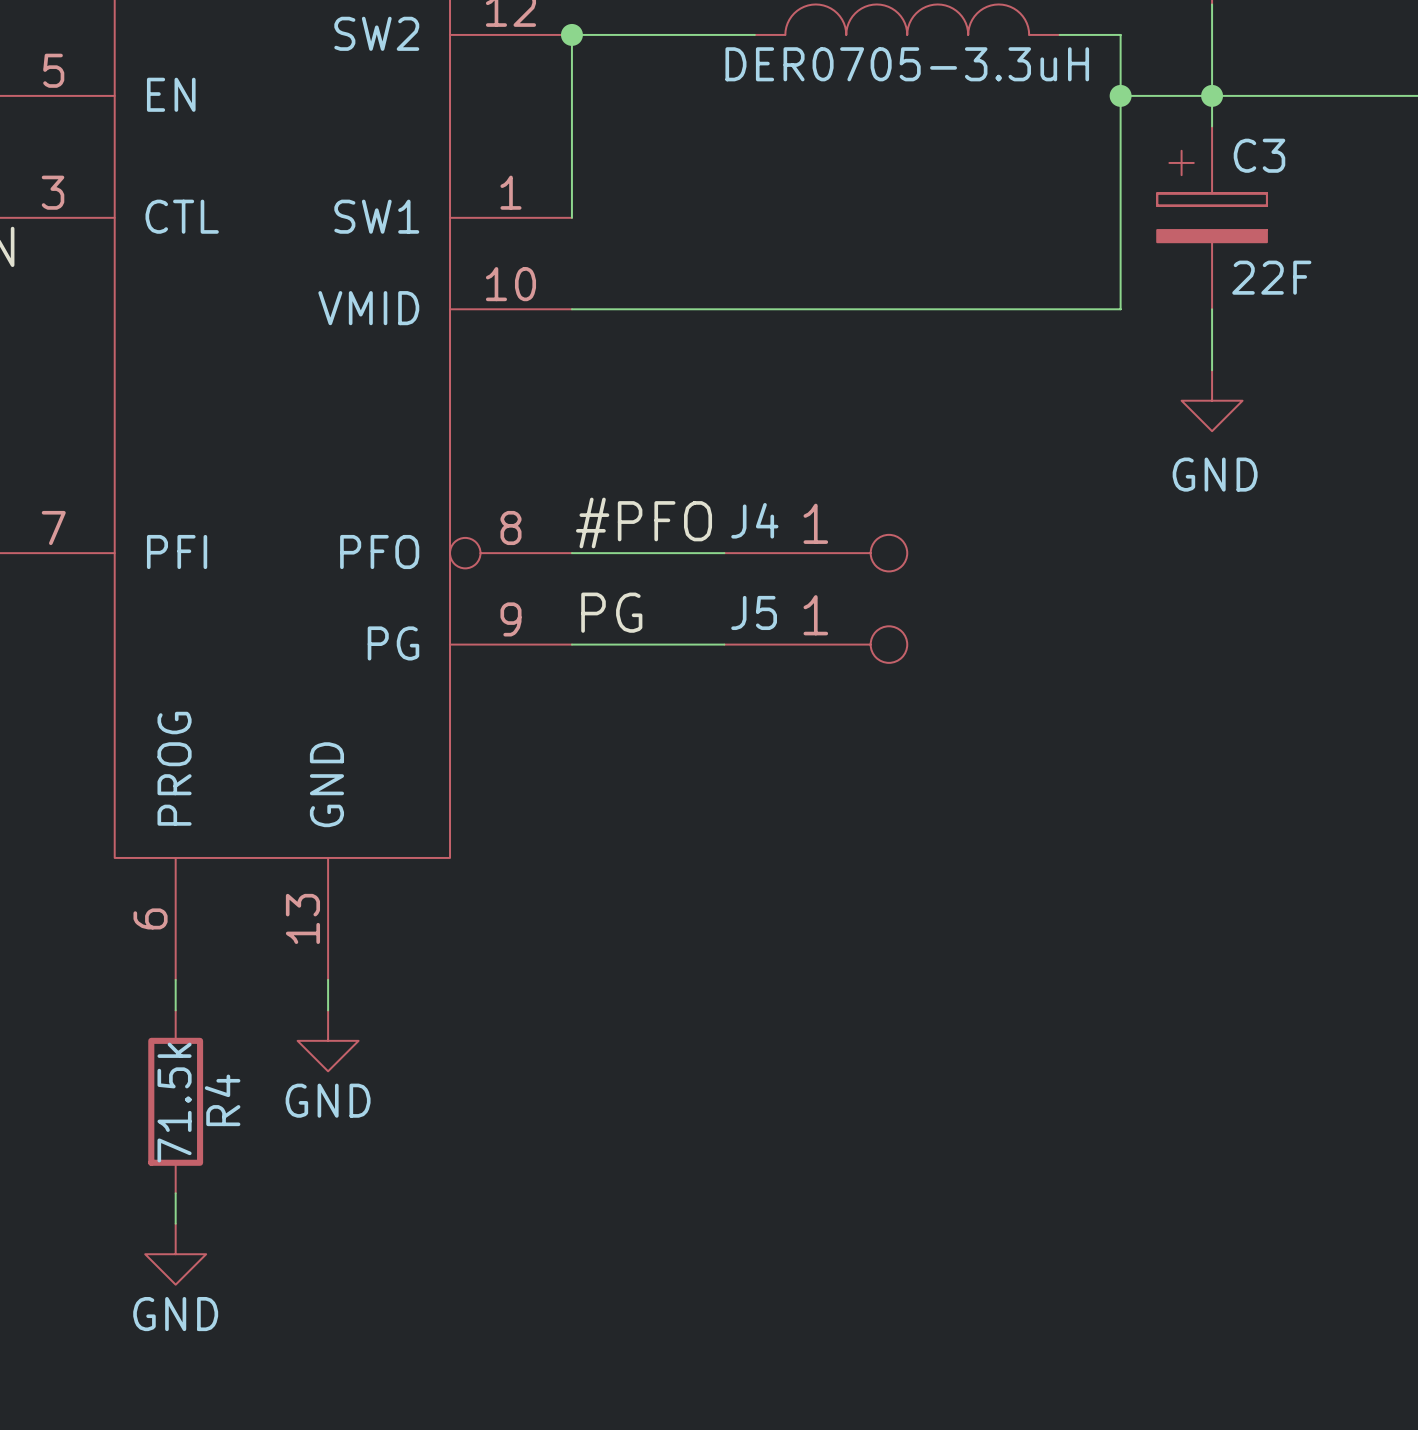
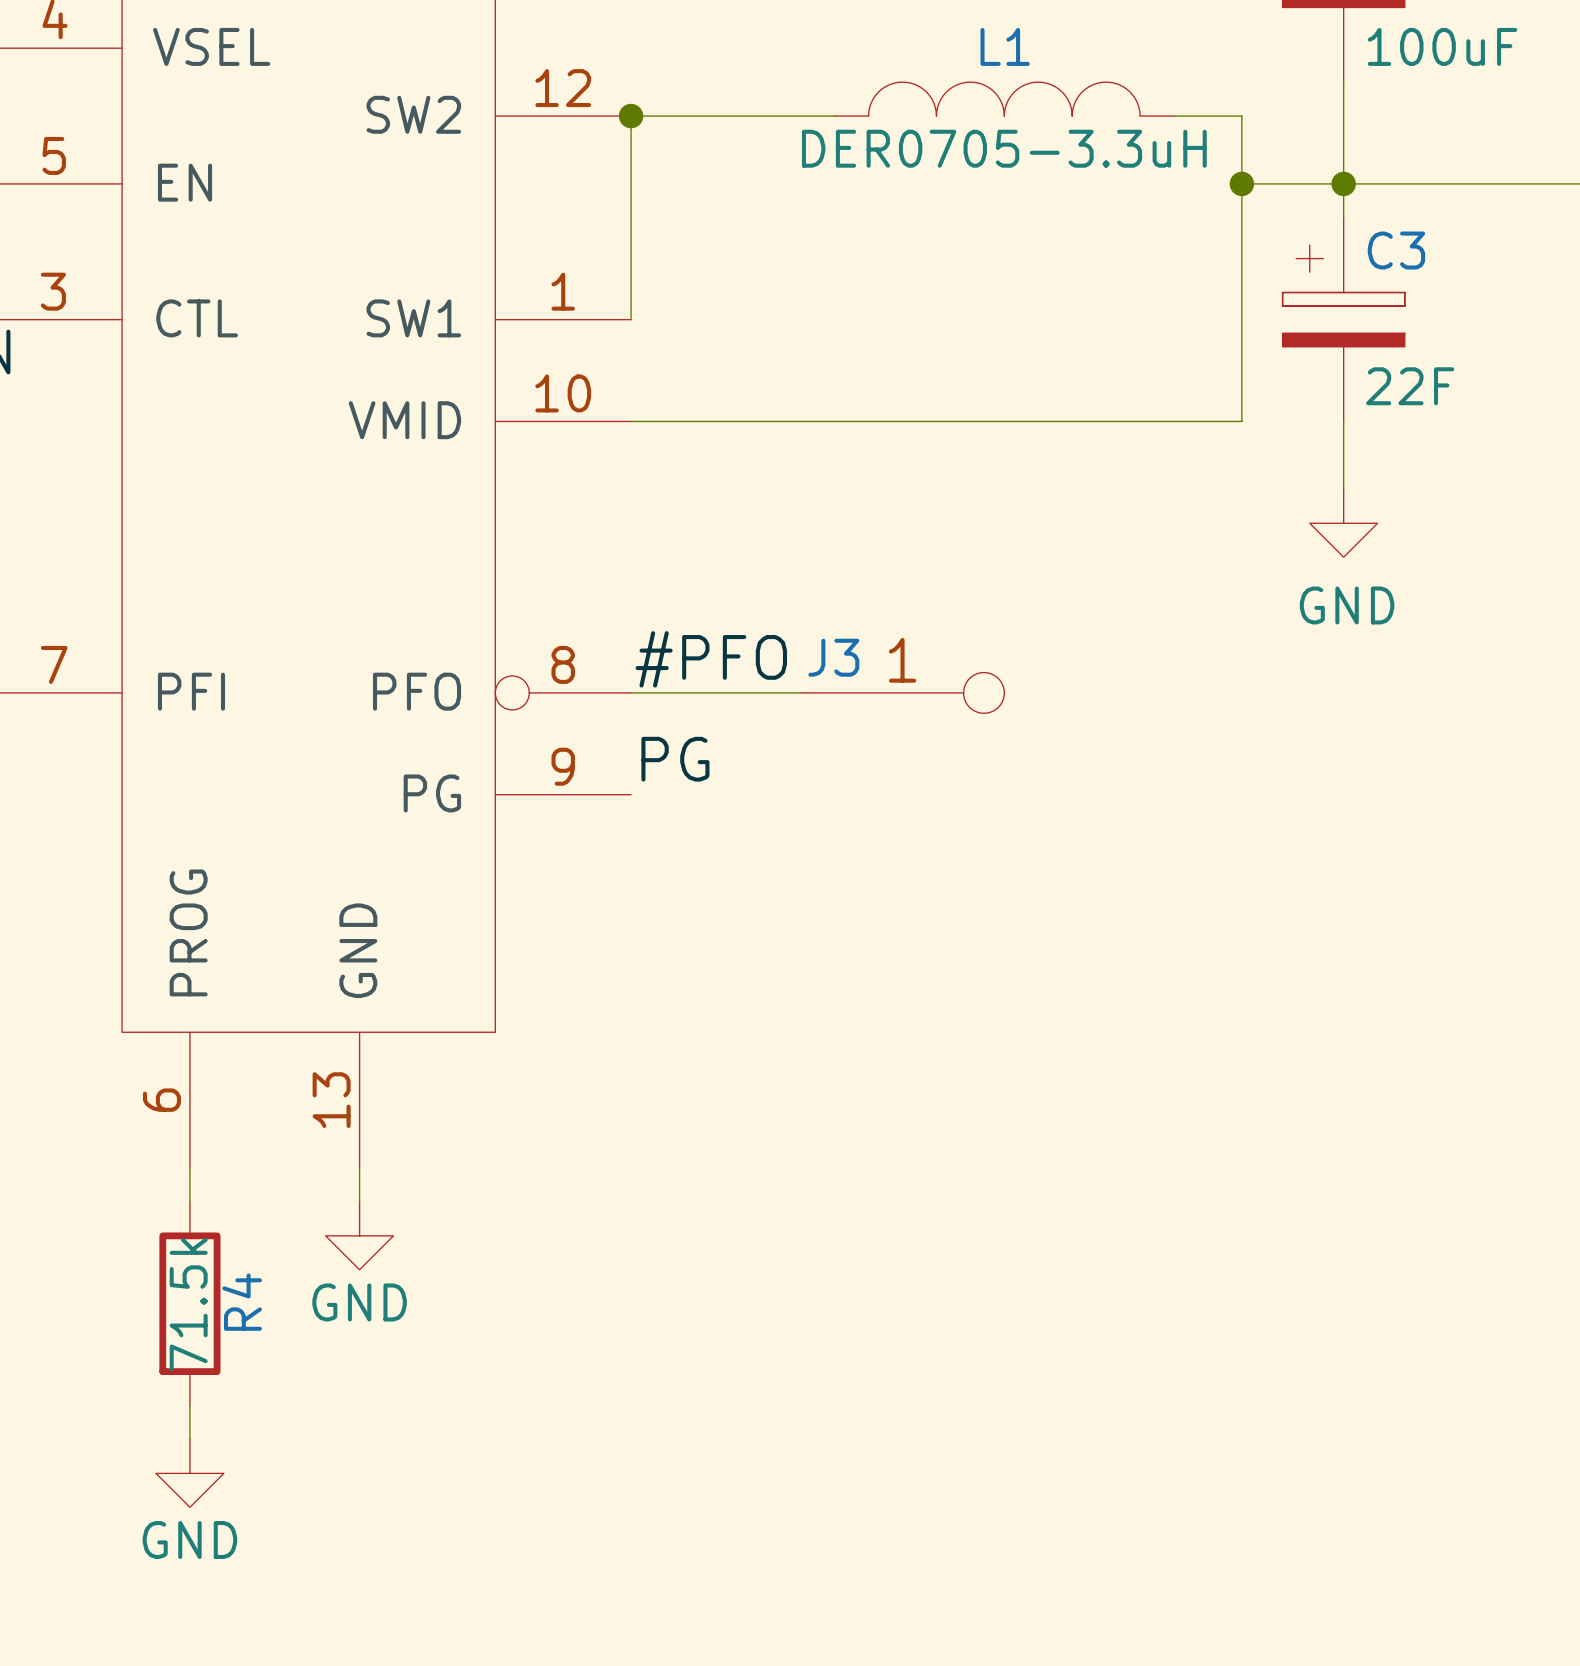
J4 name: J4 (754, 520) -> J3 (833, 657)
wire: (571, 644) (724, 644) -> none
J5: (815, 644) -> none

